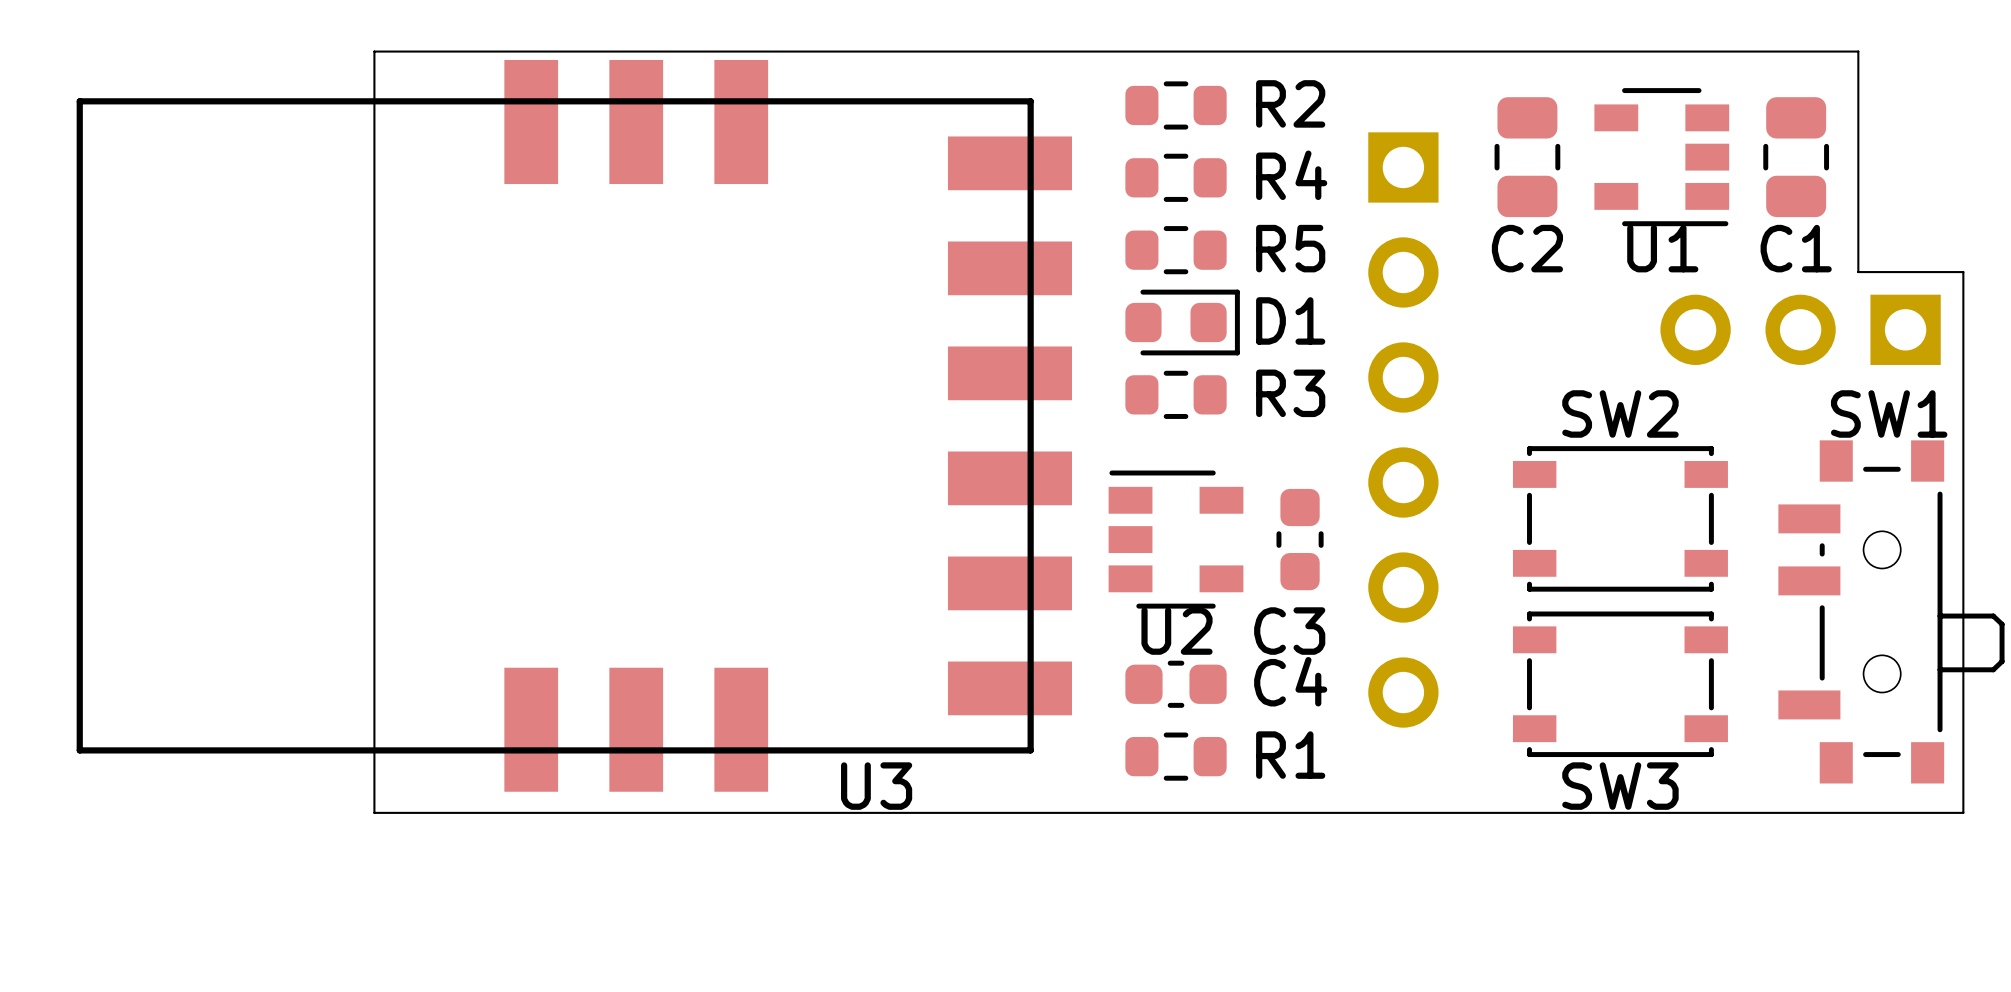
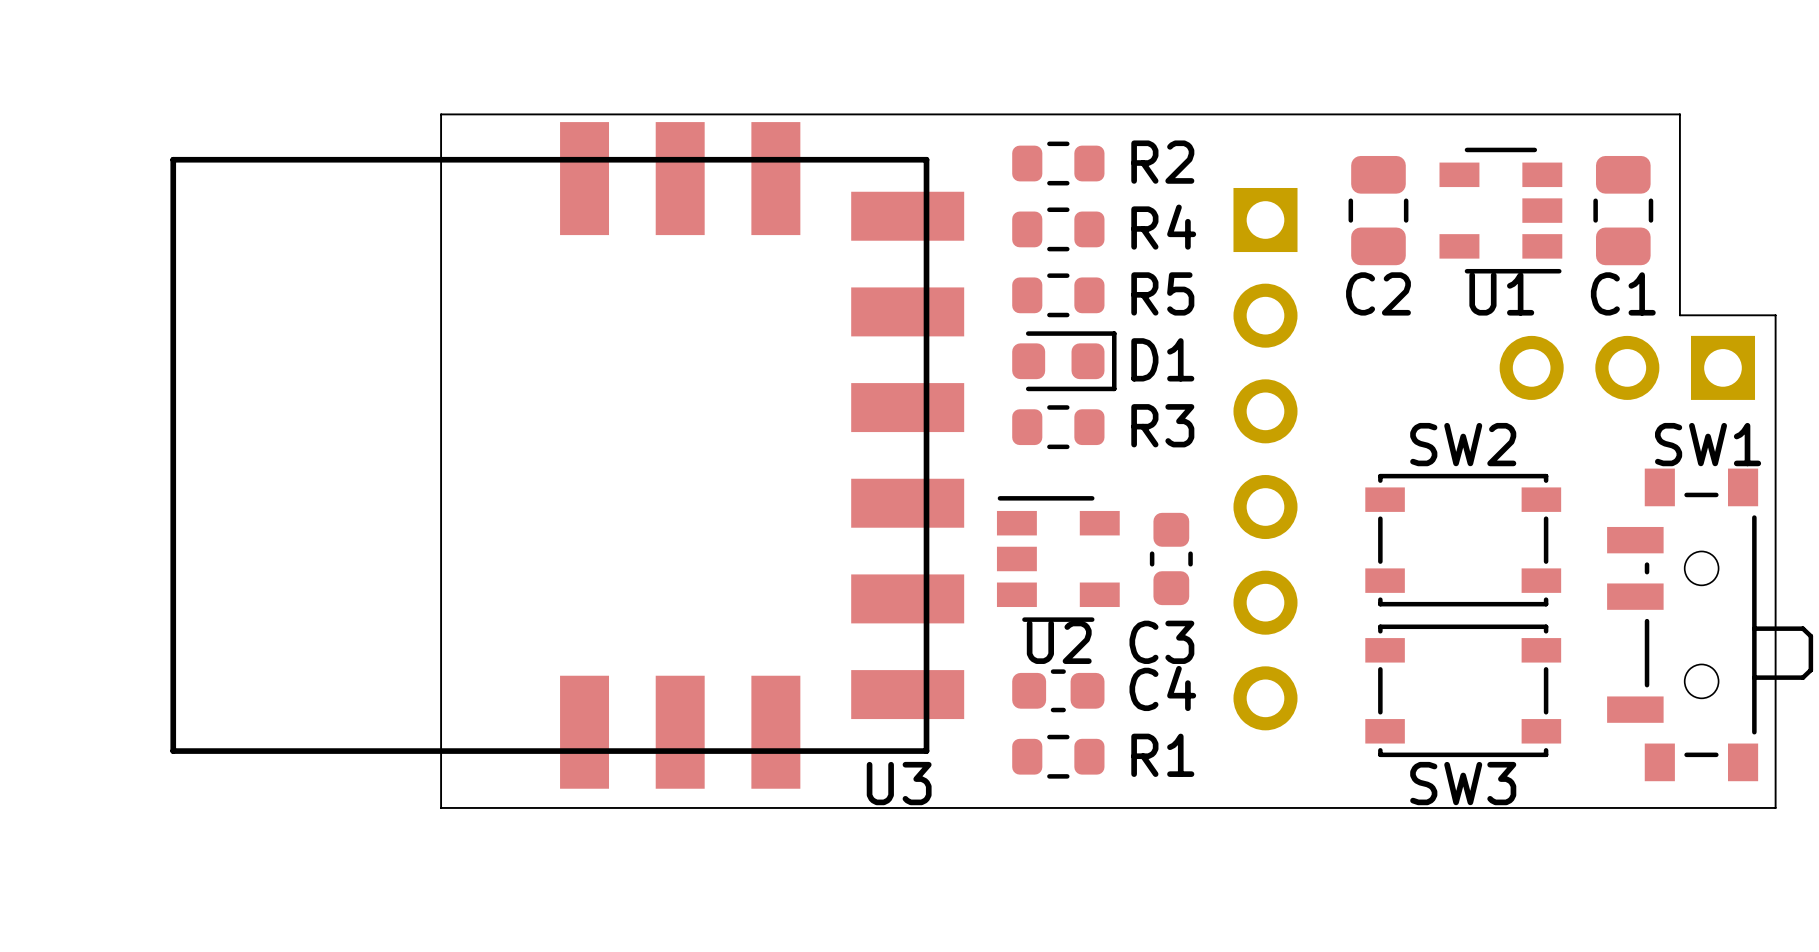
board edge: (498, 51) (374, 51) (374, 812) (498, 812) -> (441, 114) (441, 807)
U3 footprint: [76, 59, 1072, 792] -> [170, 122, 965, 789]

